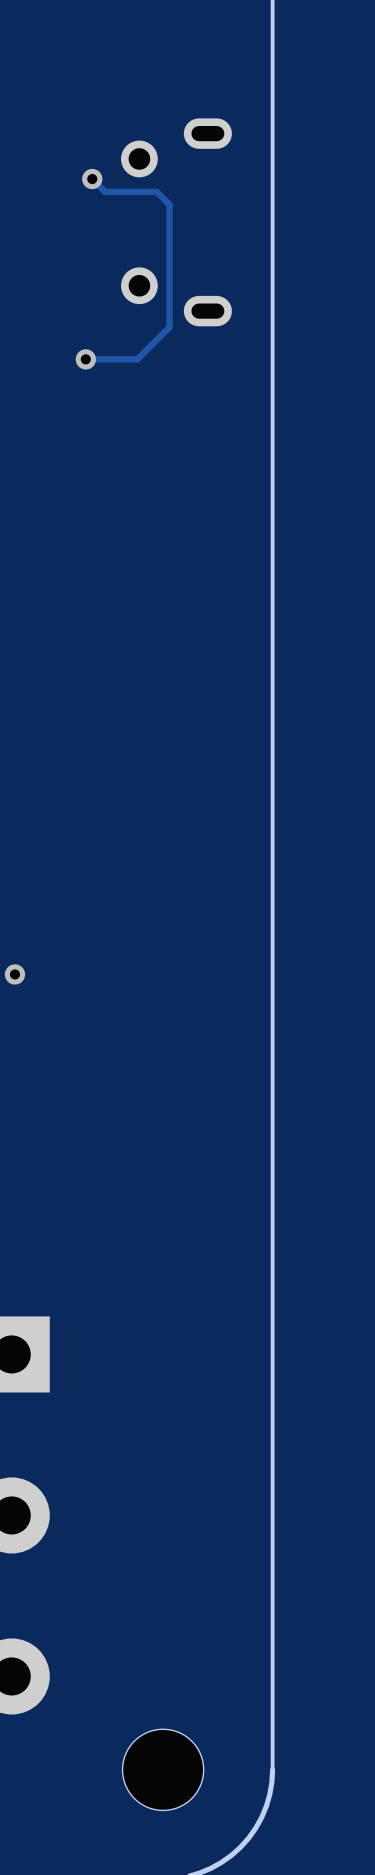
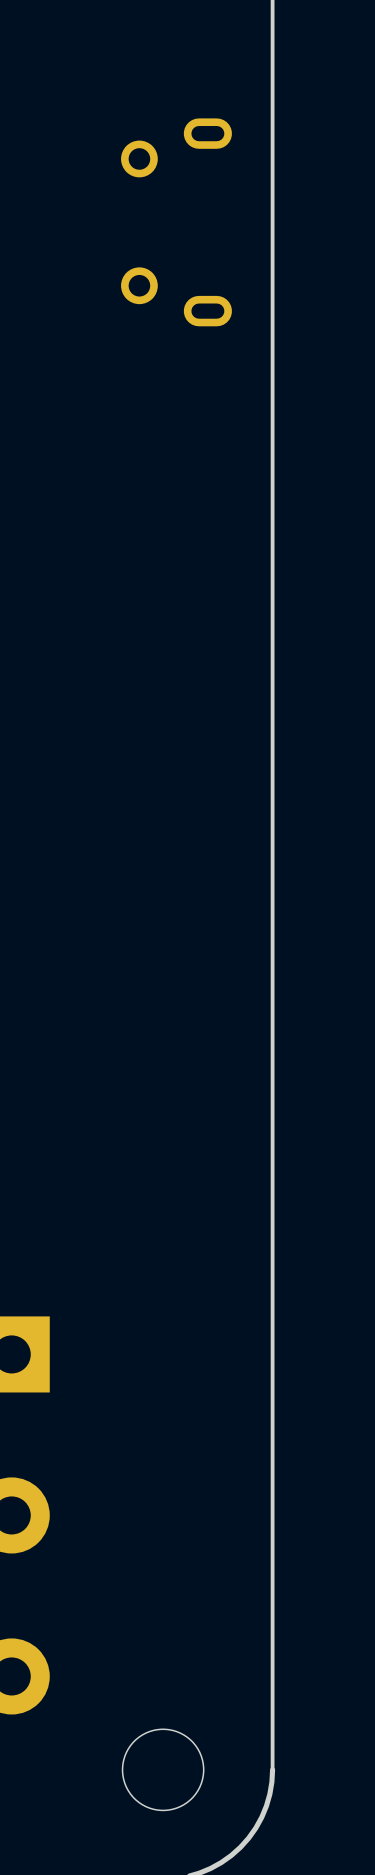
track: (92, 179) (105, 191) (156, 191) (169, 204) (169, 327) (137, 359) (85, 359) -> none
via: (92, 179) -> none
via: (85, 359) -> none
via: (14, 974) -> none

